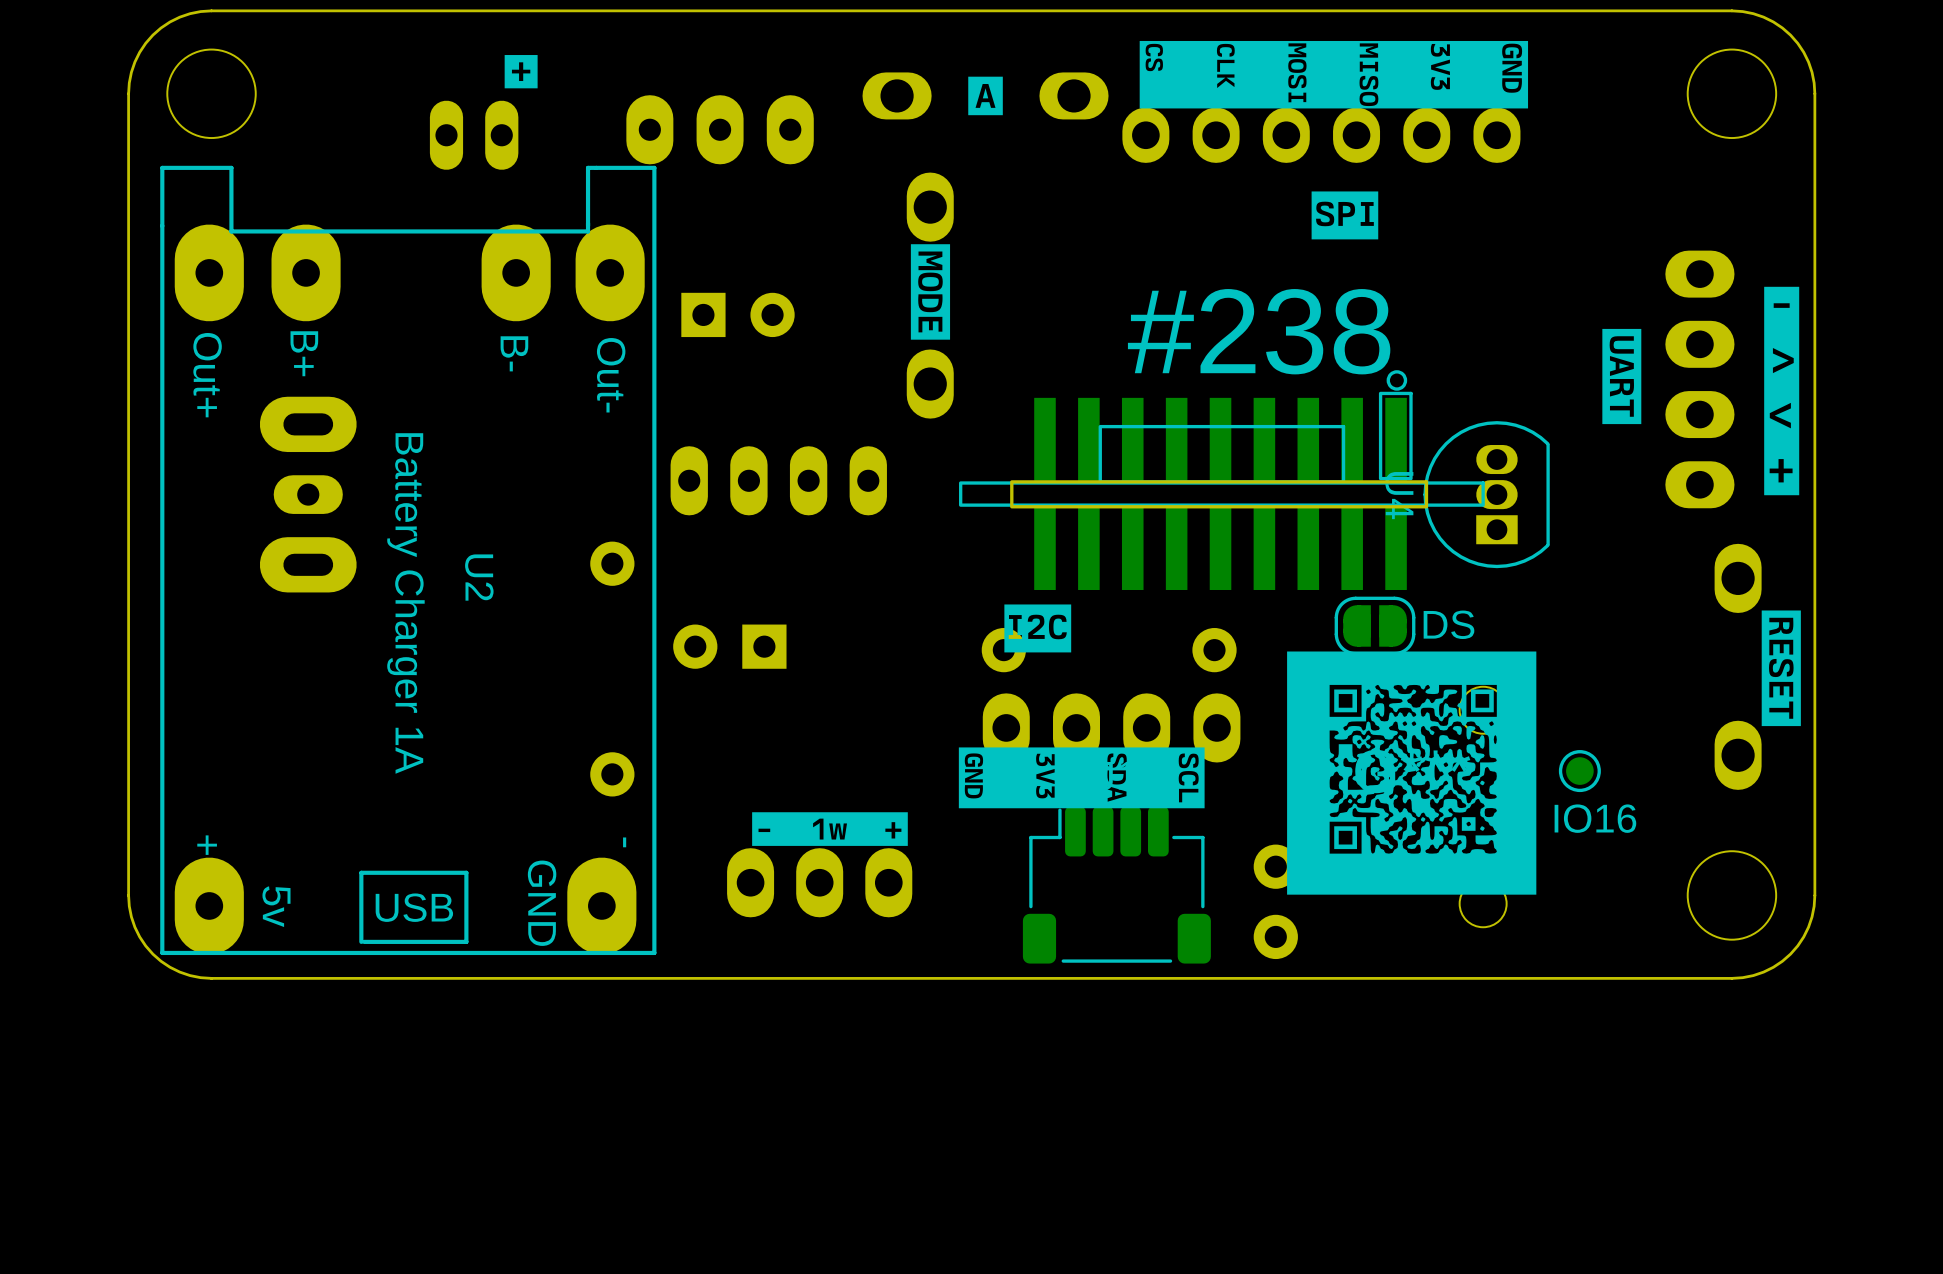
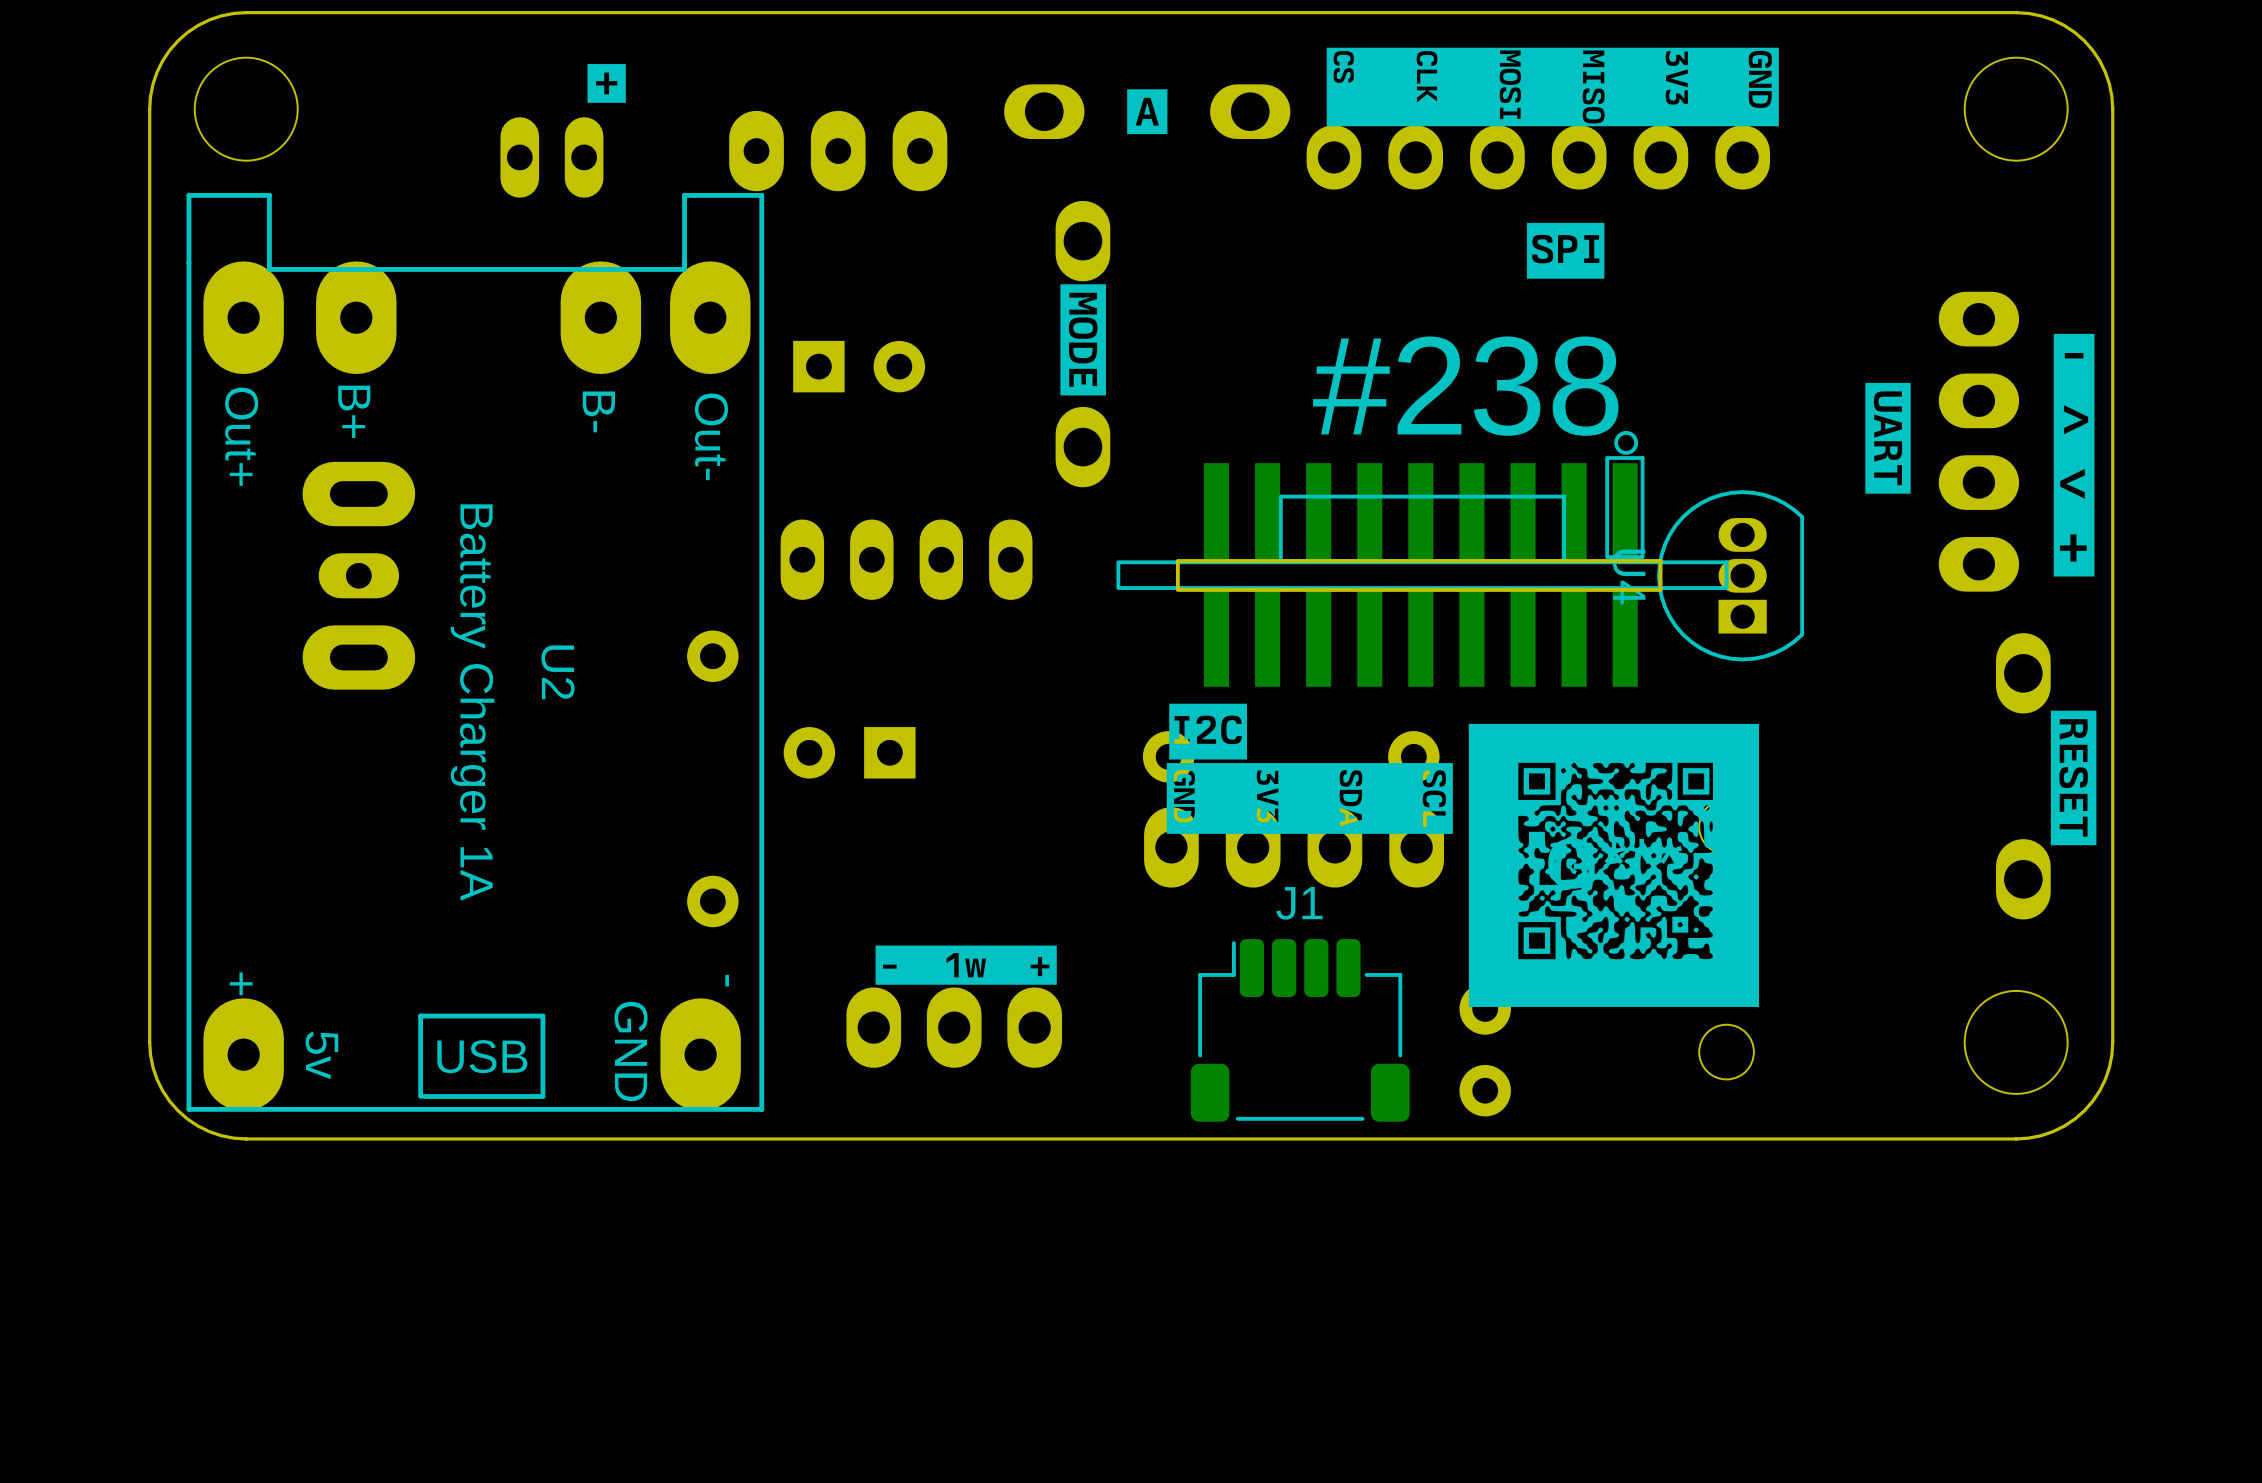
part: DS (1375, 625) -> none
part: IO16 (1579, 771) -> none
part position: (1411, 773) -> (1613, 865)
drawing position: (1081, 777) -> (1309, 798)

